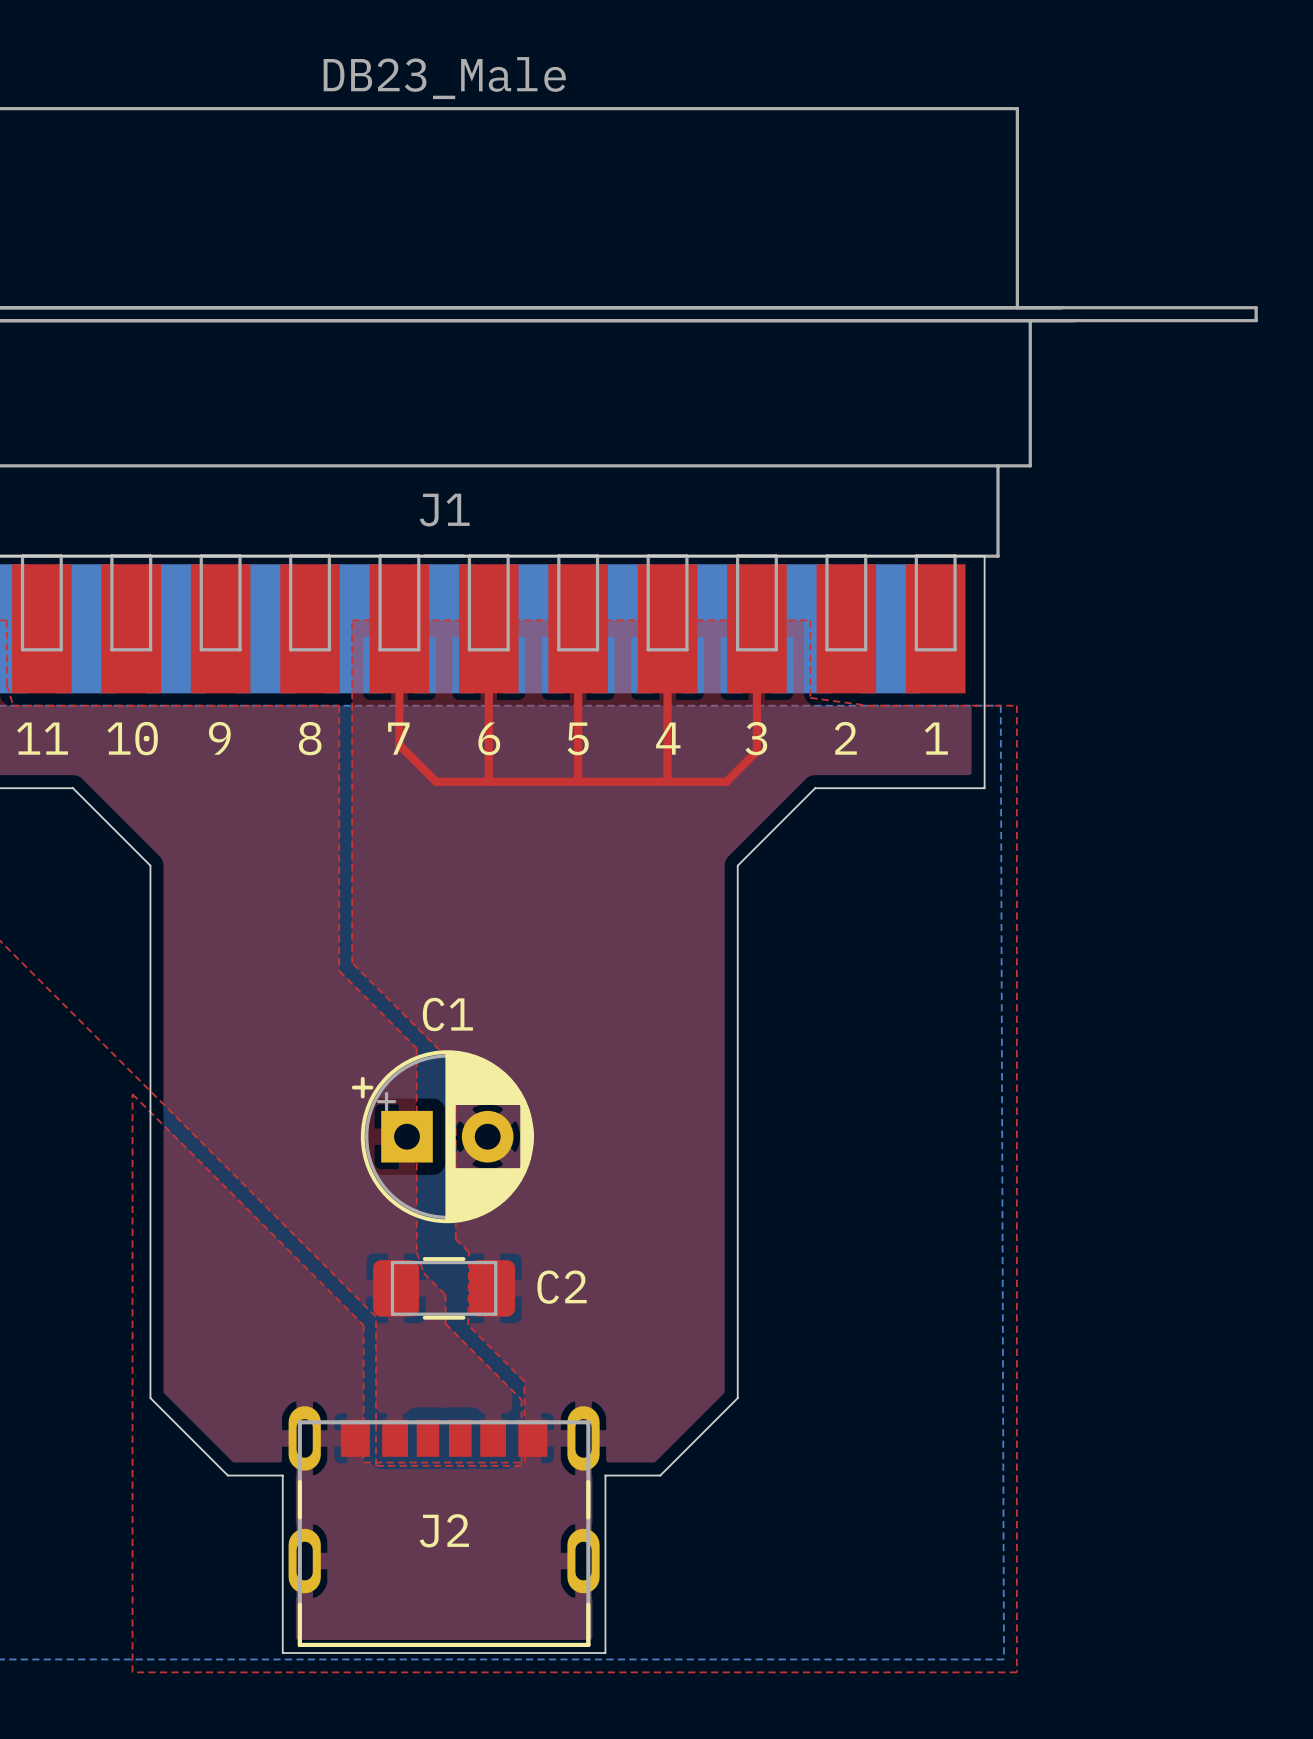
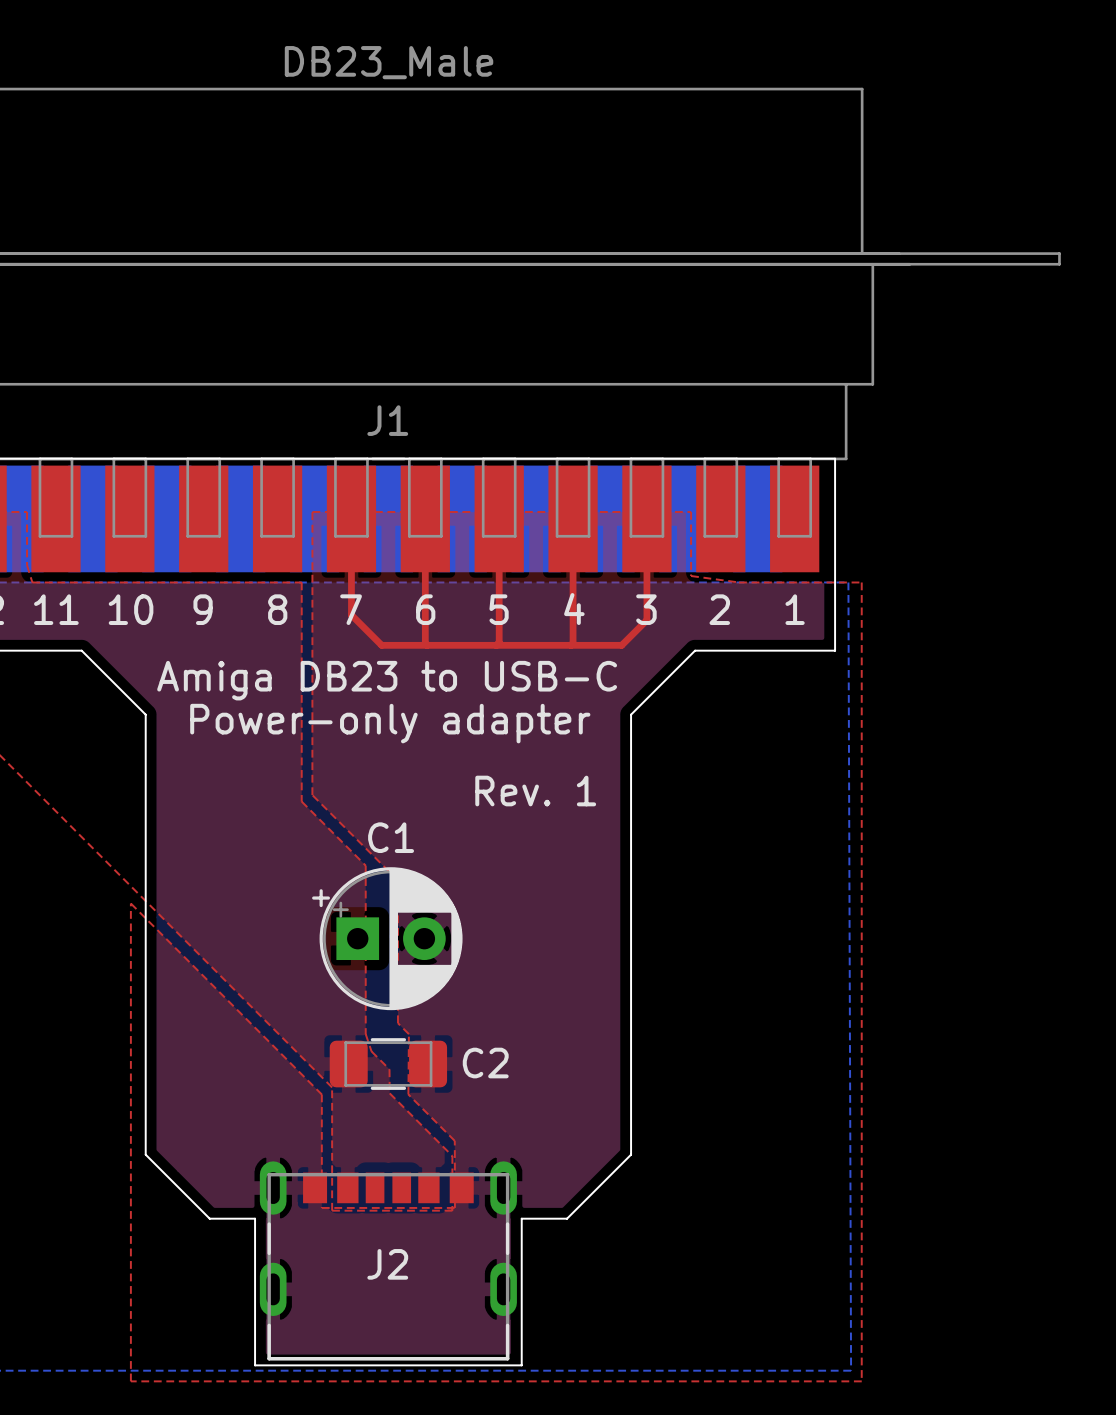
text: none -> Amiga DB23 to USB-C (387, 680)
text: none -> Power-only adapter (390, 723)
text: none -> Rev. 1 (535, 791)

